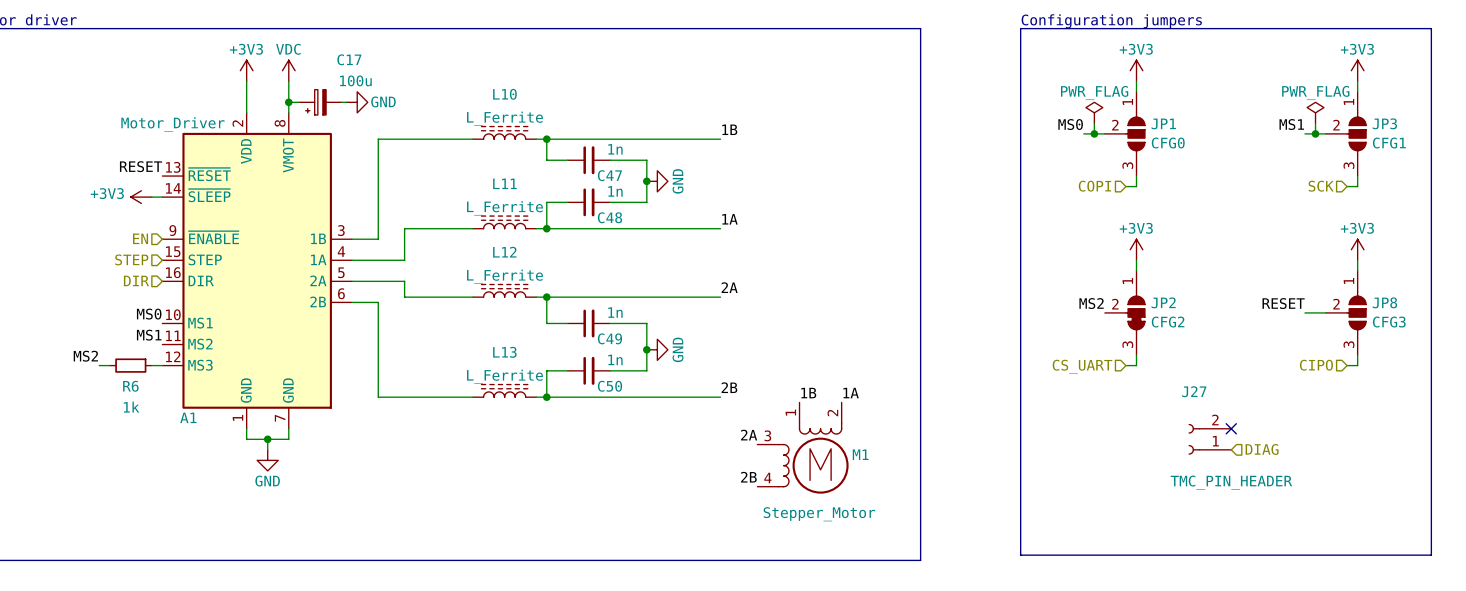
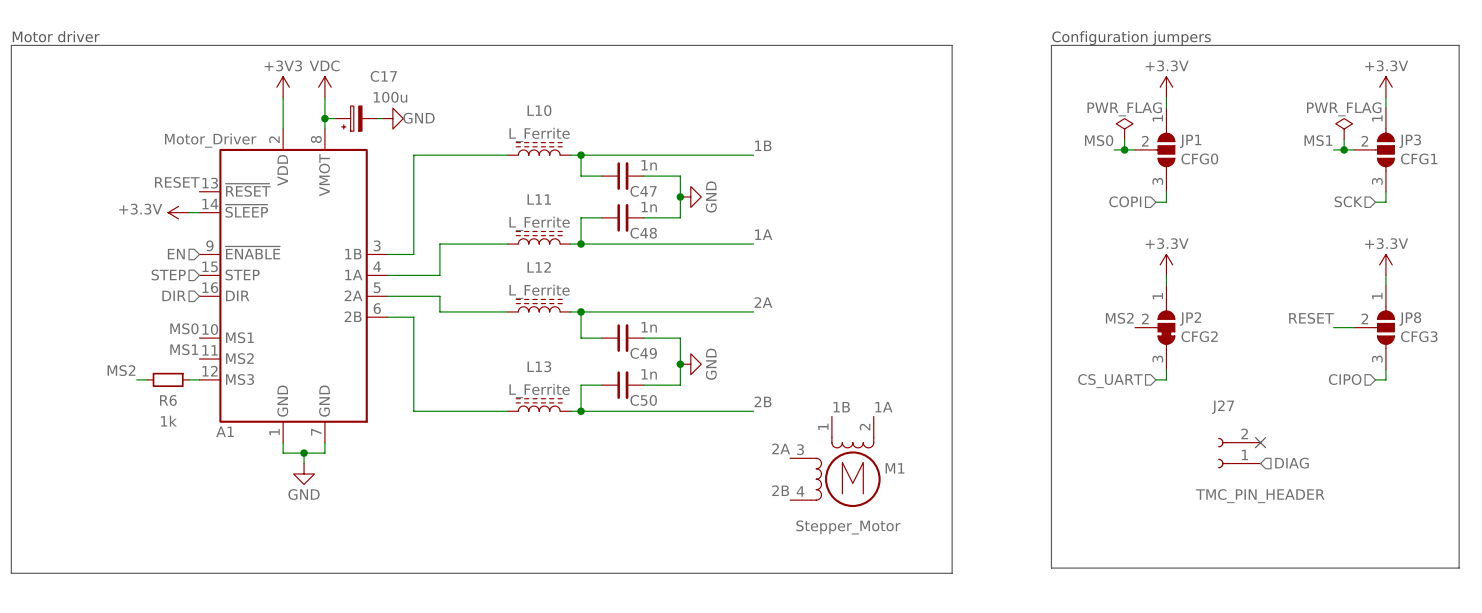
power symbol: +3V3 (1136, 70) -> +3.3V (1166, 87)
power symbol: +3V3 (1357, 70) -> +3.3V (1385, 87)
power symbol: +3V3 (141, 197) -> +3.3V (178, 212)
power symbol: +3V3 (1136, 249) -> +3.3V (1166, 264)
power symbol: +3V3 (1357, 249) -> +3.3V (1385, 264)

